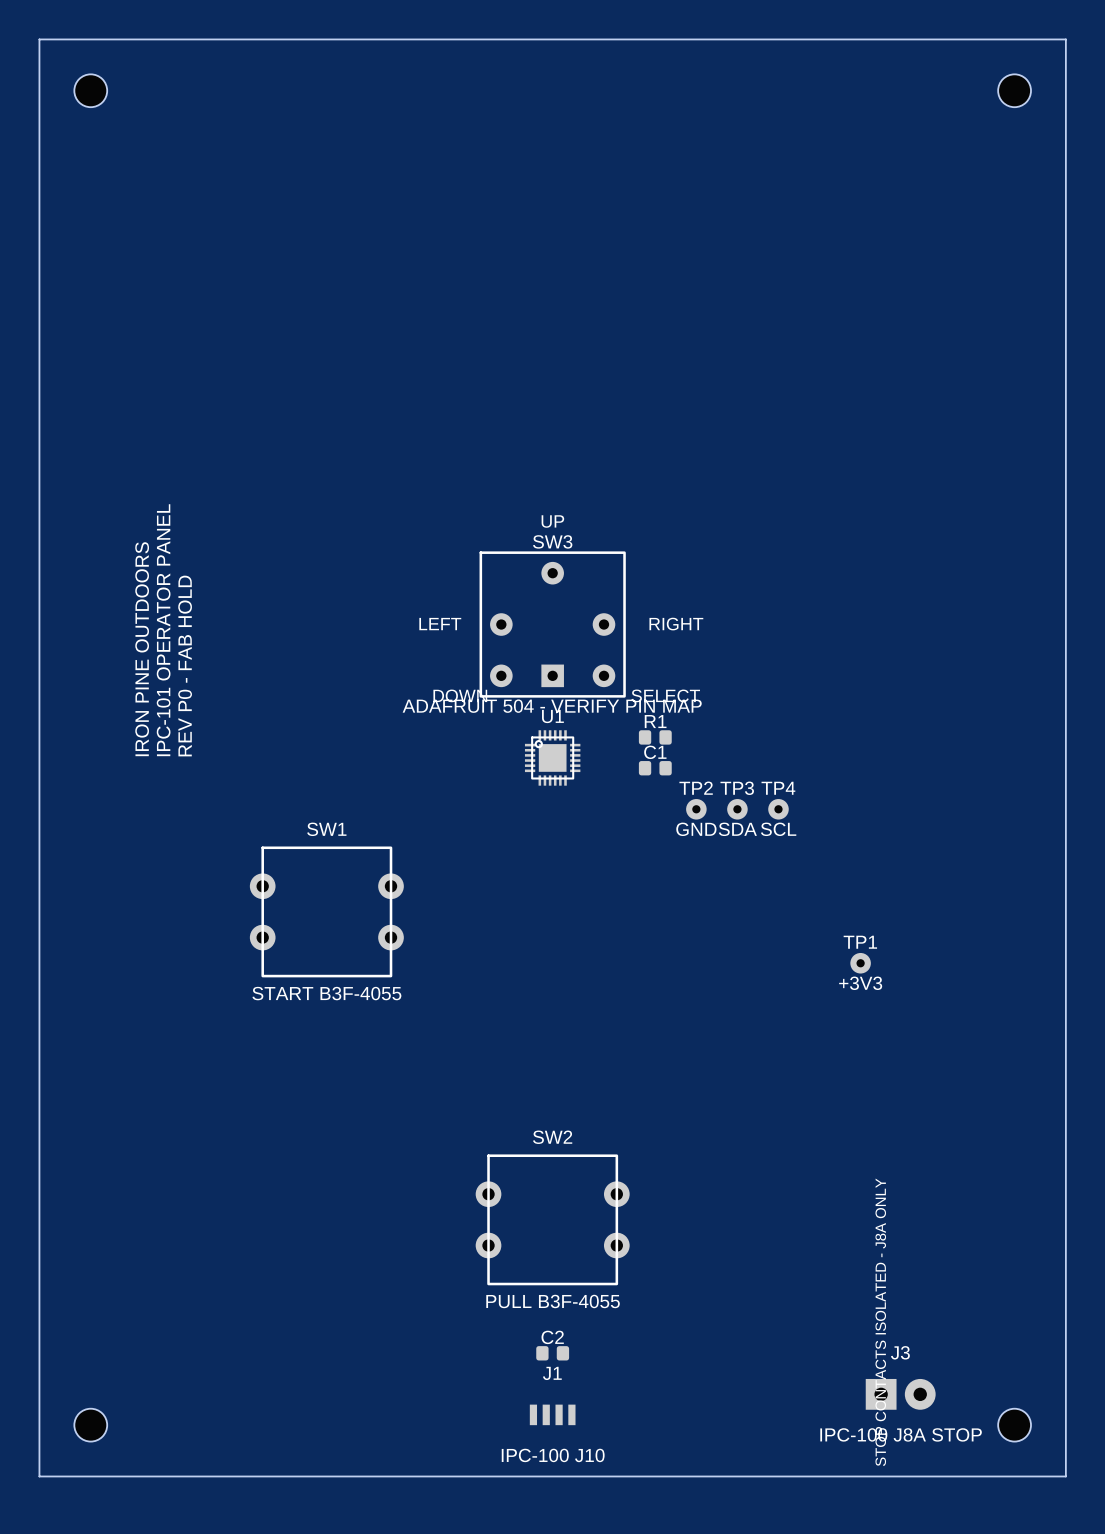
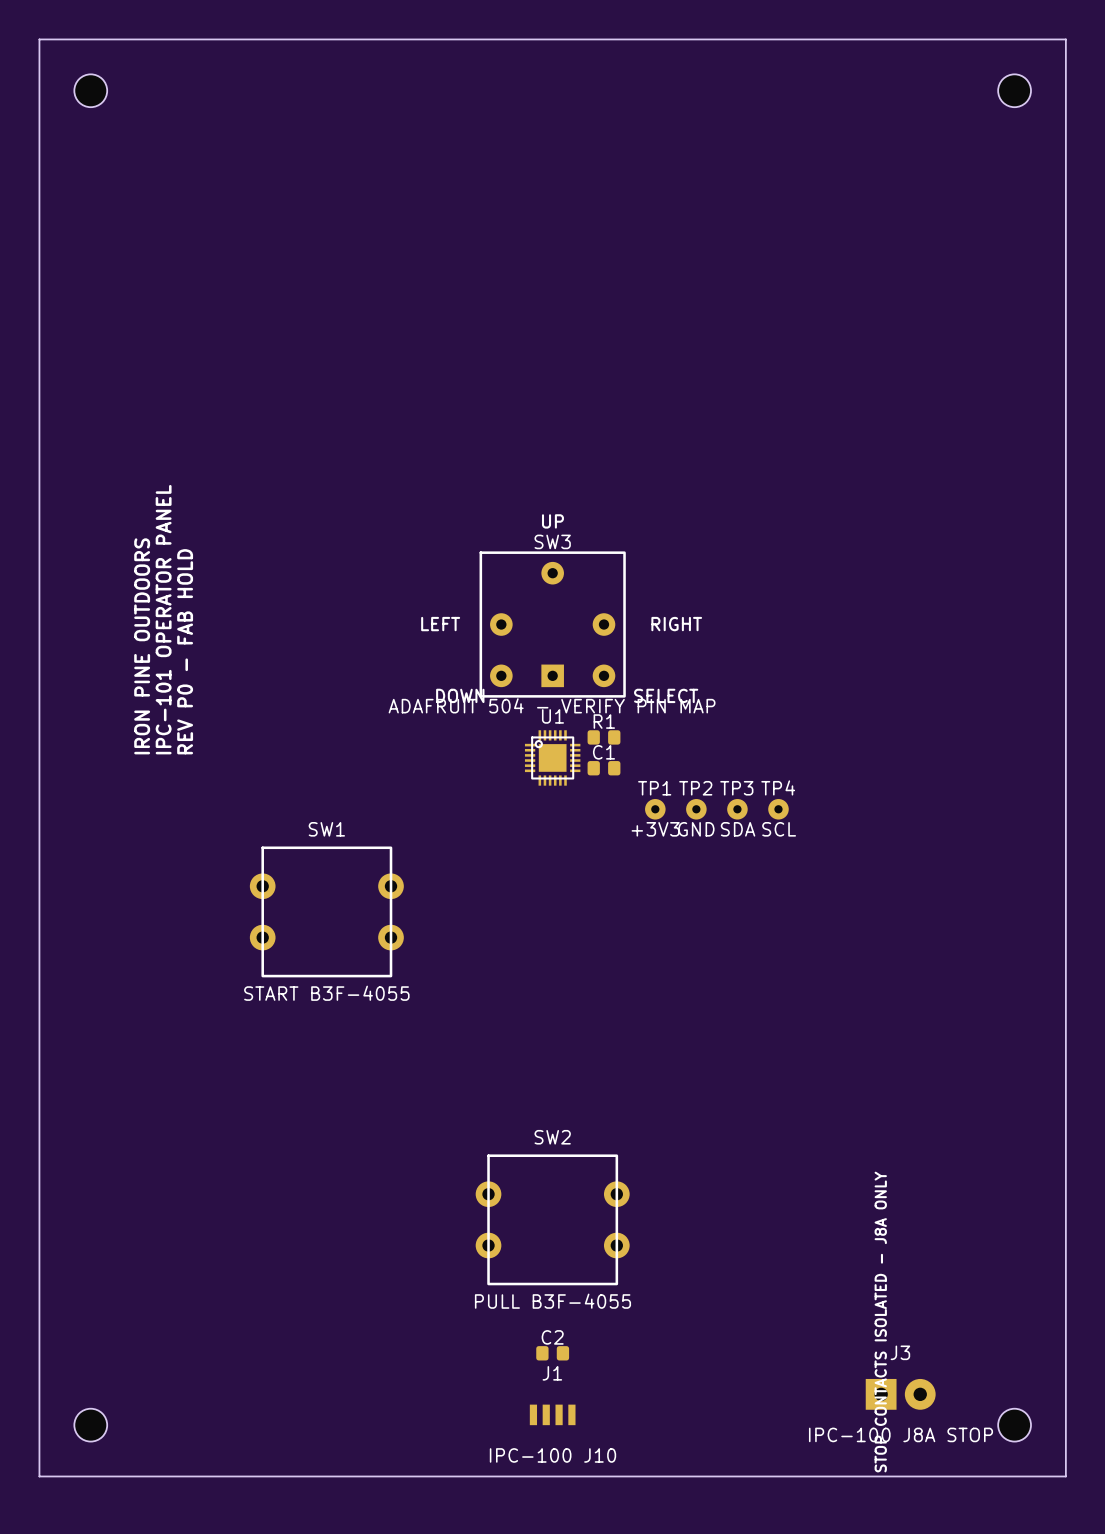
R1 position: (655, 737) -> (603, 737)
C1 position: (655, 768) -> (603, 768)
TP1 position: (860, 963) -> (655, 809)

